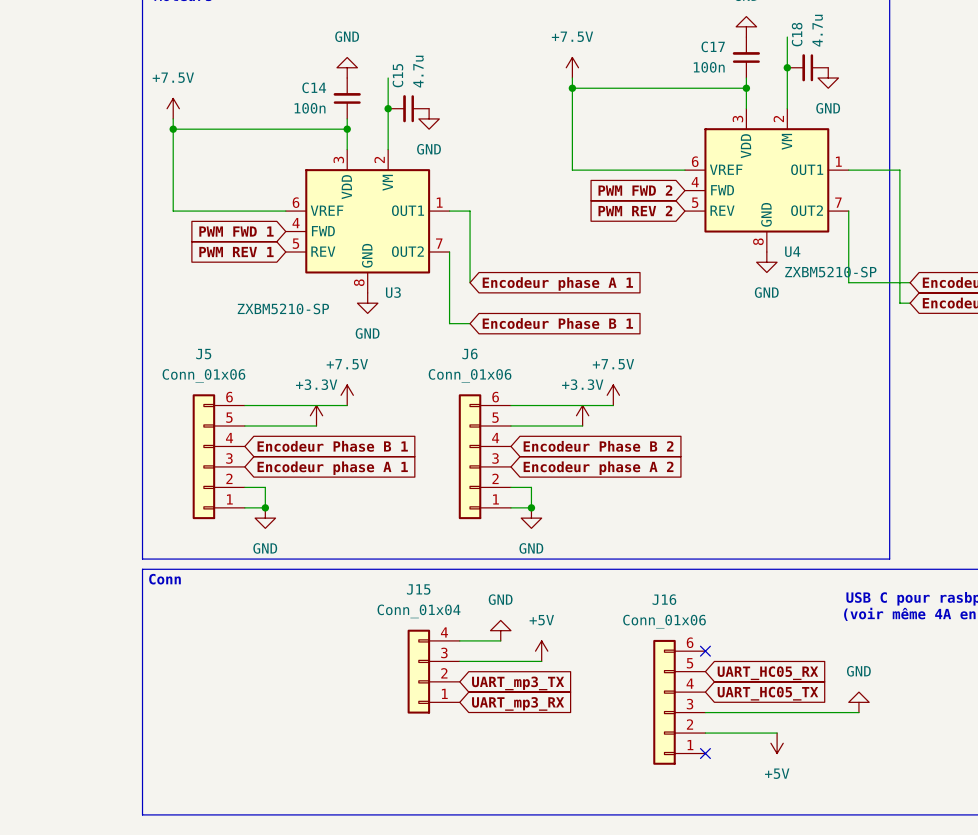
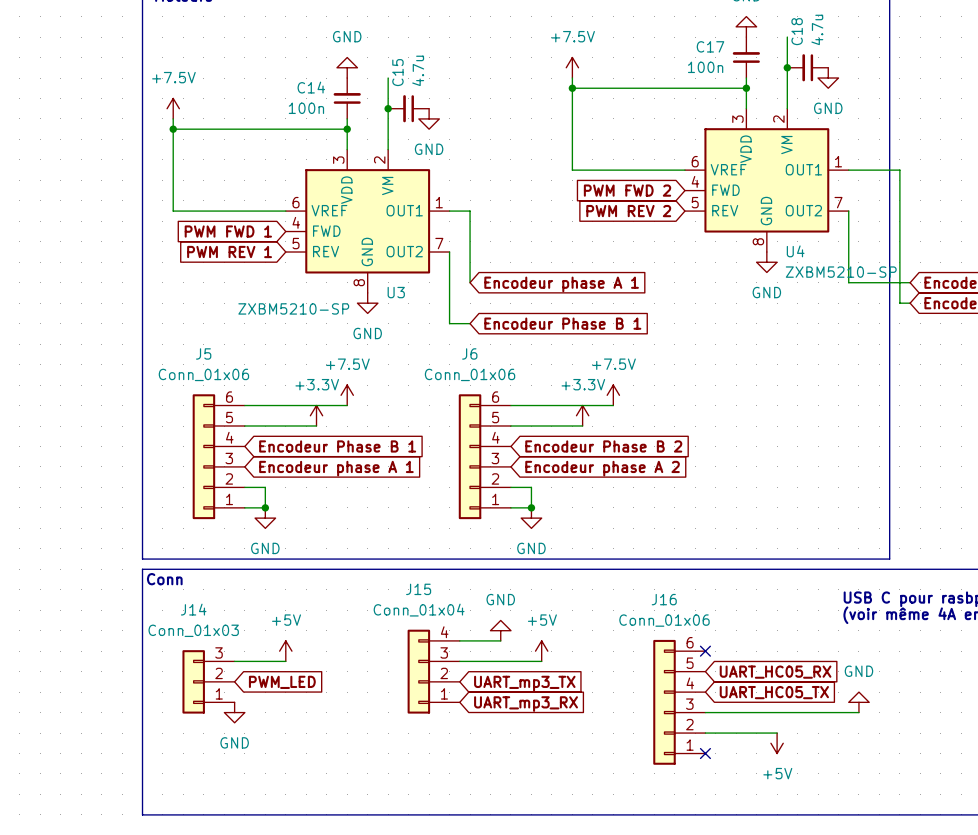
power symbol: none -> +5V (285, 651)
wire: none -> (234, 661) (285, 661)
J14: none -> Conn_01x03 (208, 681)
global label: none -> PWM_LED (282, 682)
power symbol: none -> GND (234, 712)

